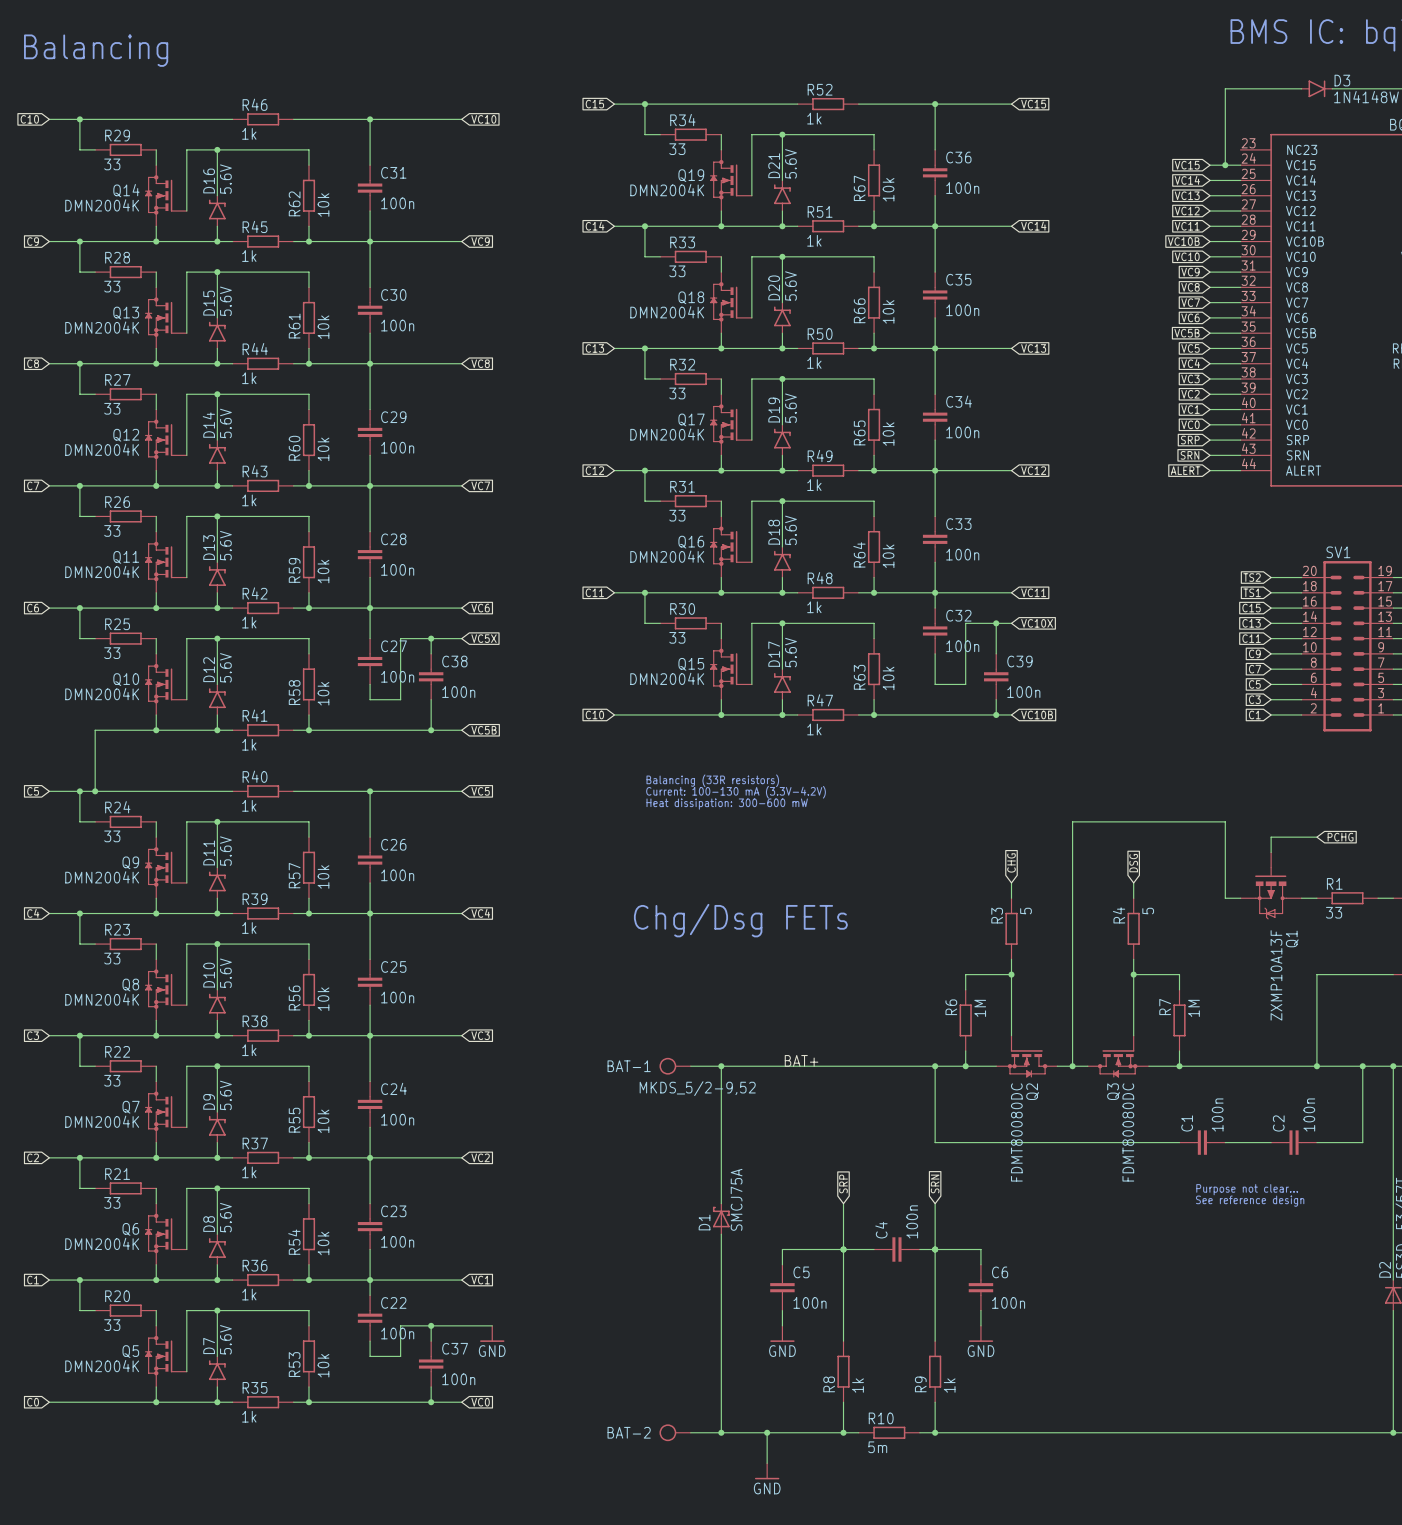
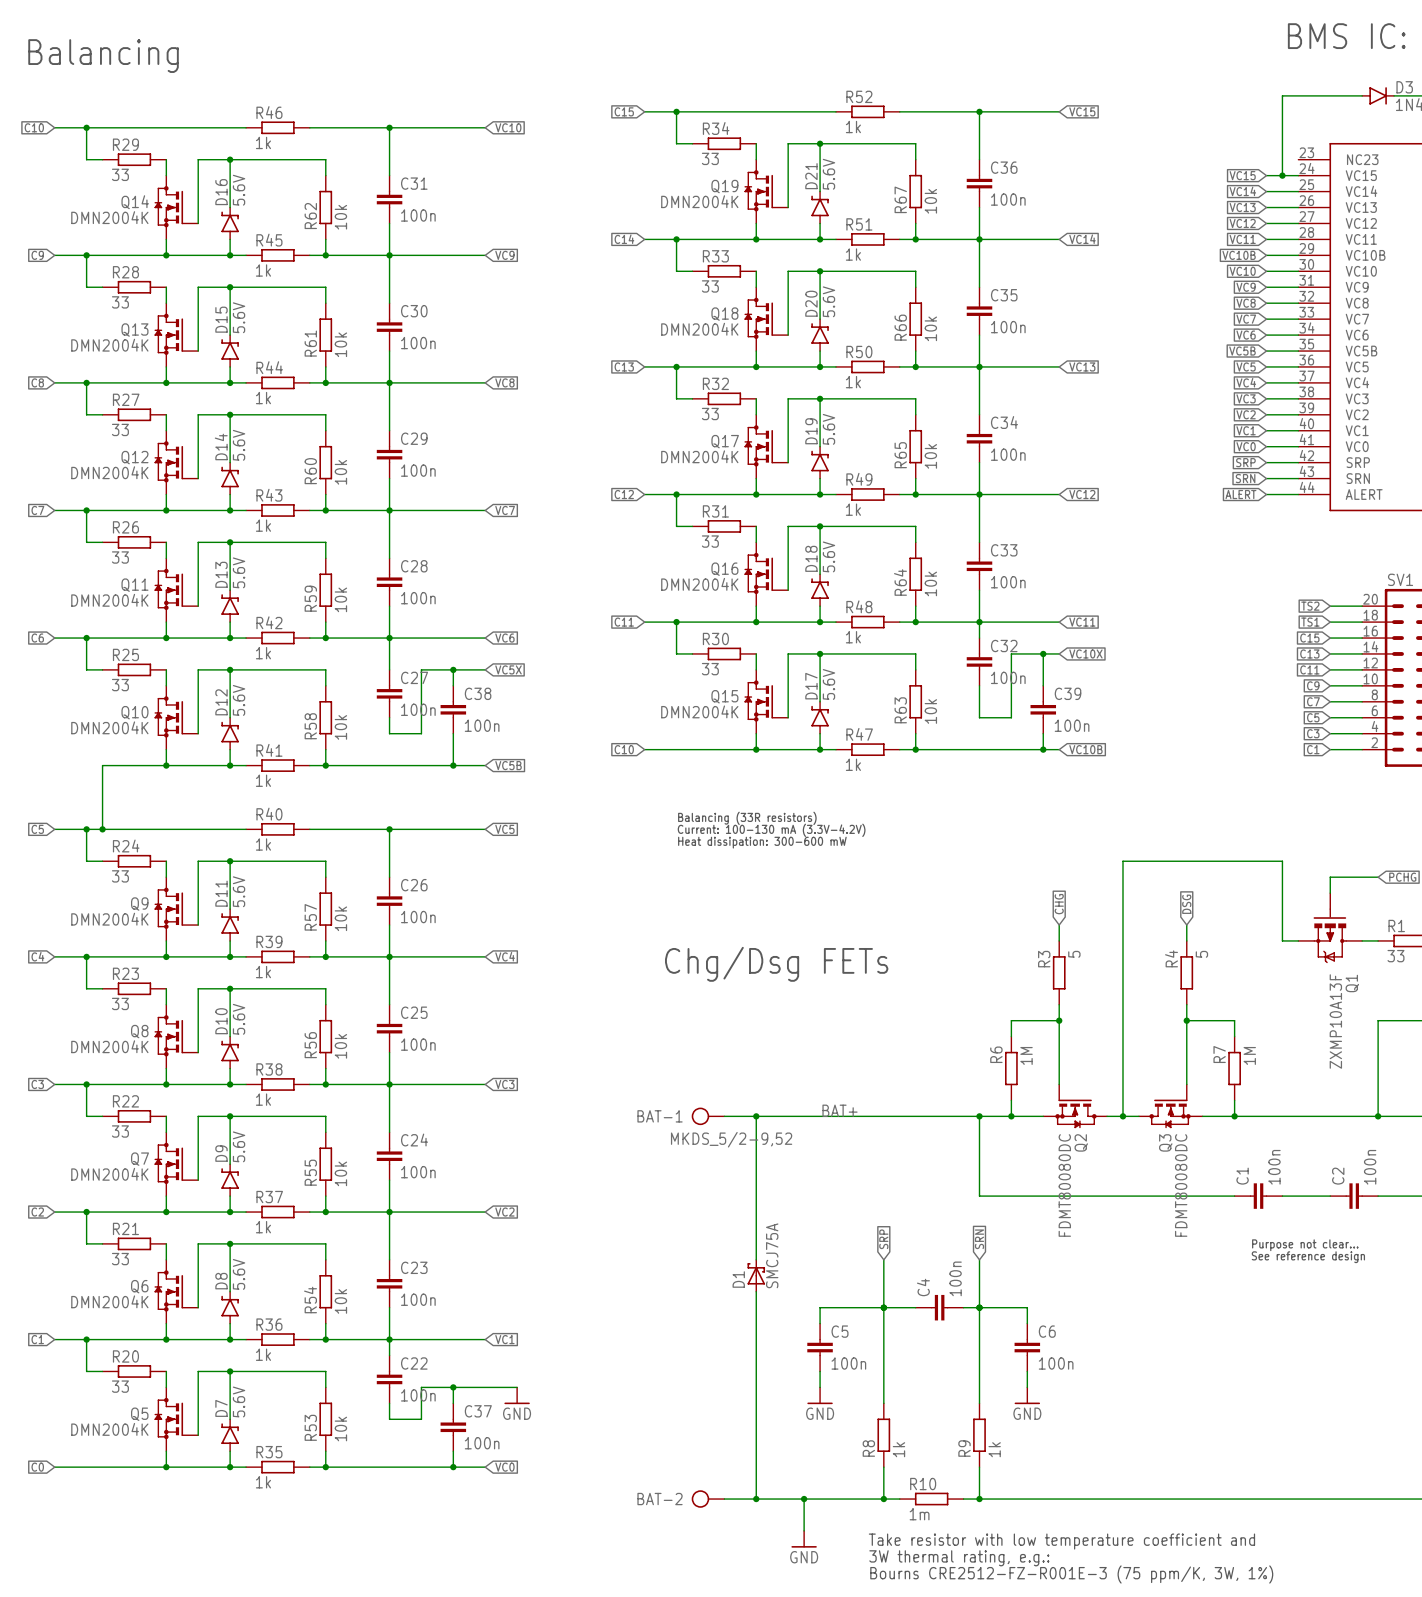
R10 value: 5m (877, 1447) -> 1m (919, 1514)
text: none -> Take resistor with low temperature coefficient and (1061, 1541)
text: none -> 3W thermal rating, e.g.: (959, 1558)
text: none -> Bourns CRE2512-FZ-R001E-3 (75 ppm/K, 3W, 1%) (1071, 1574)

